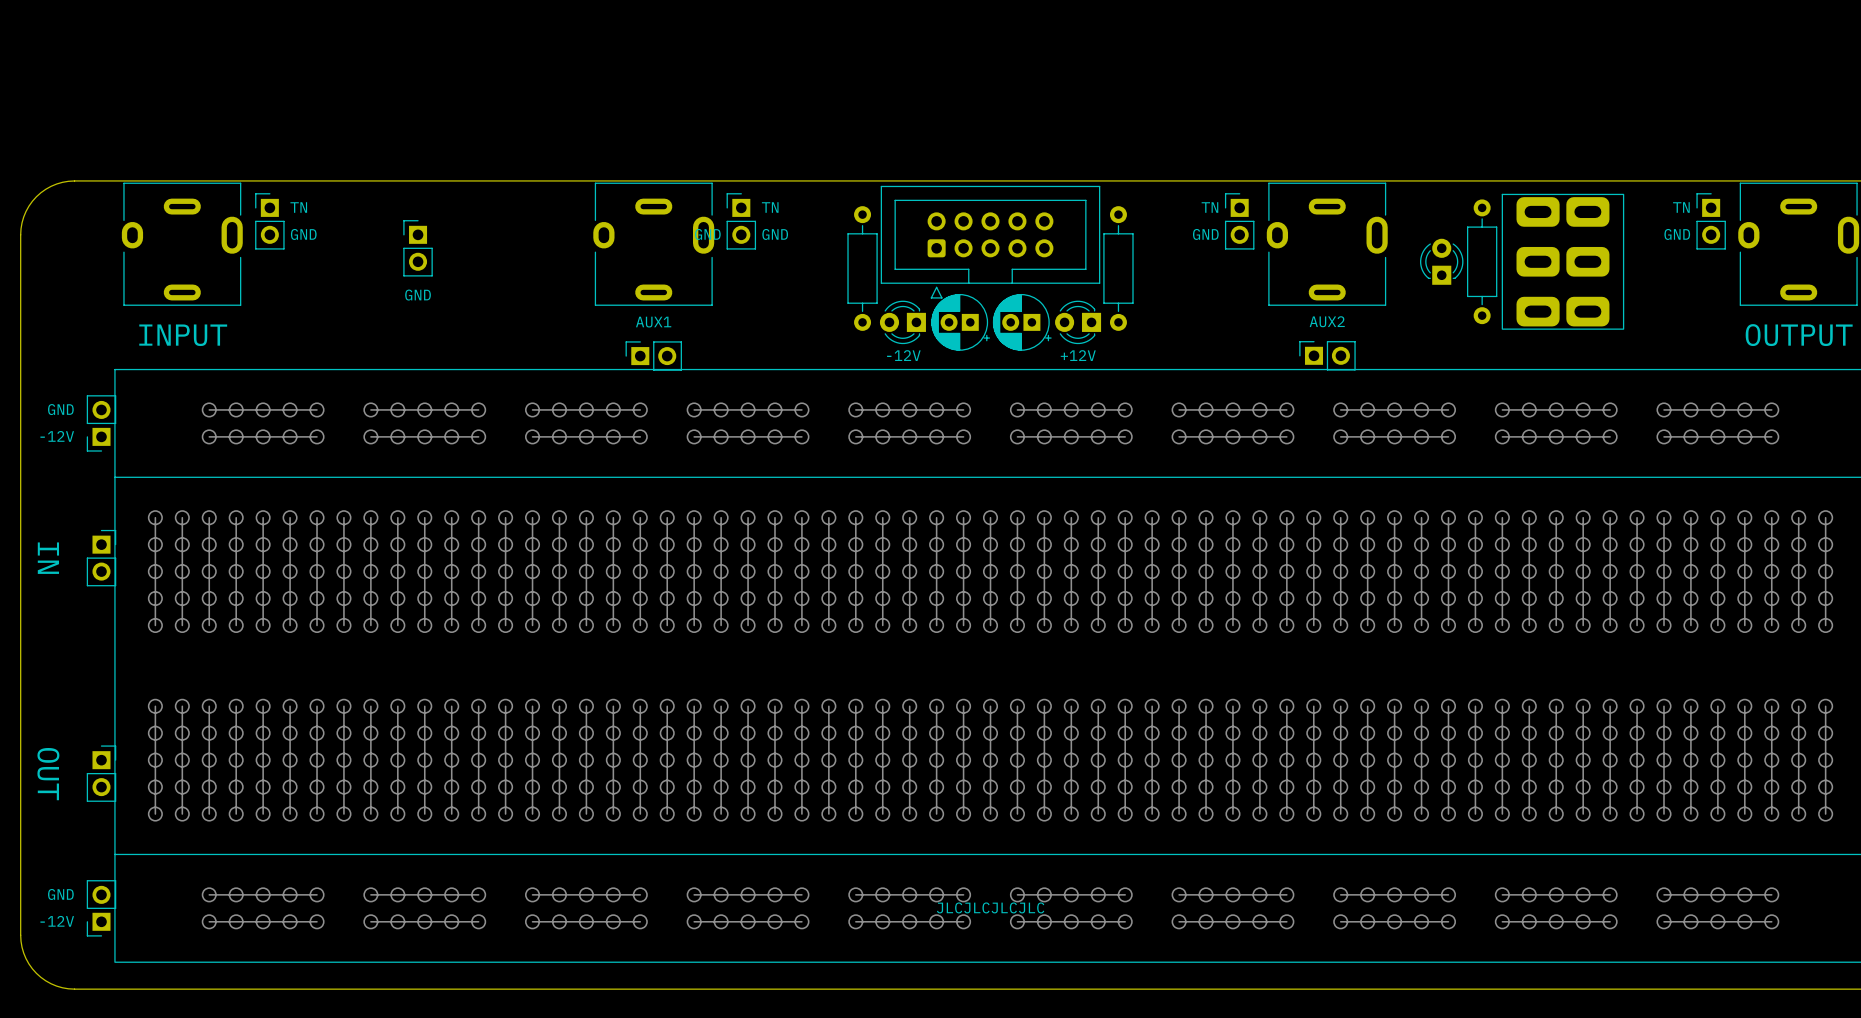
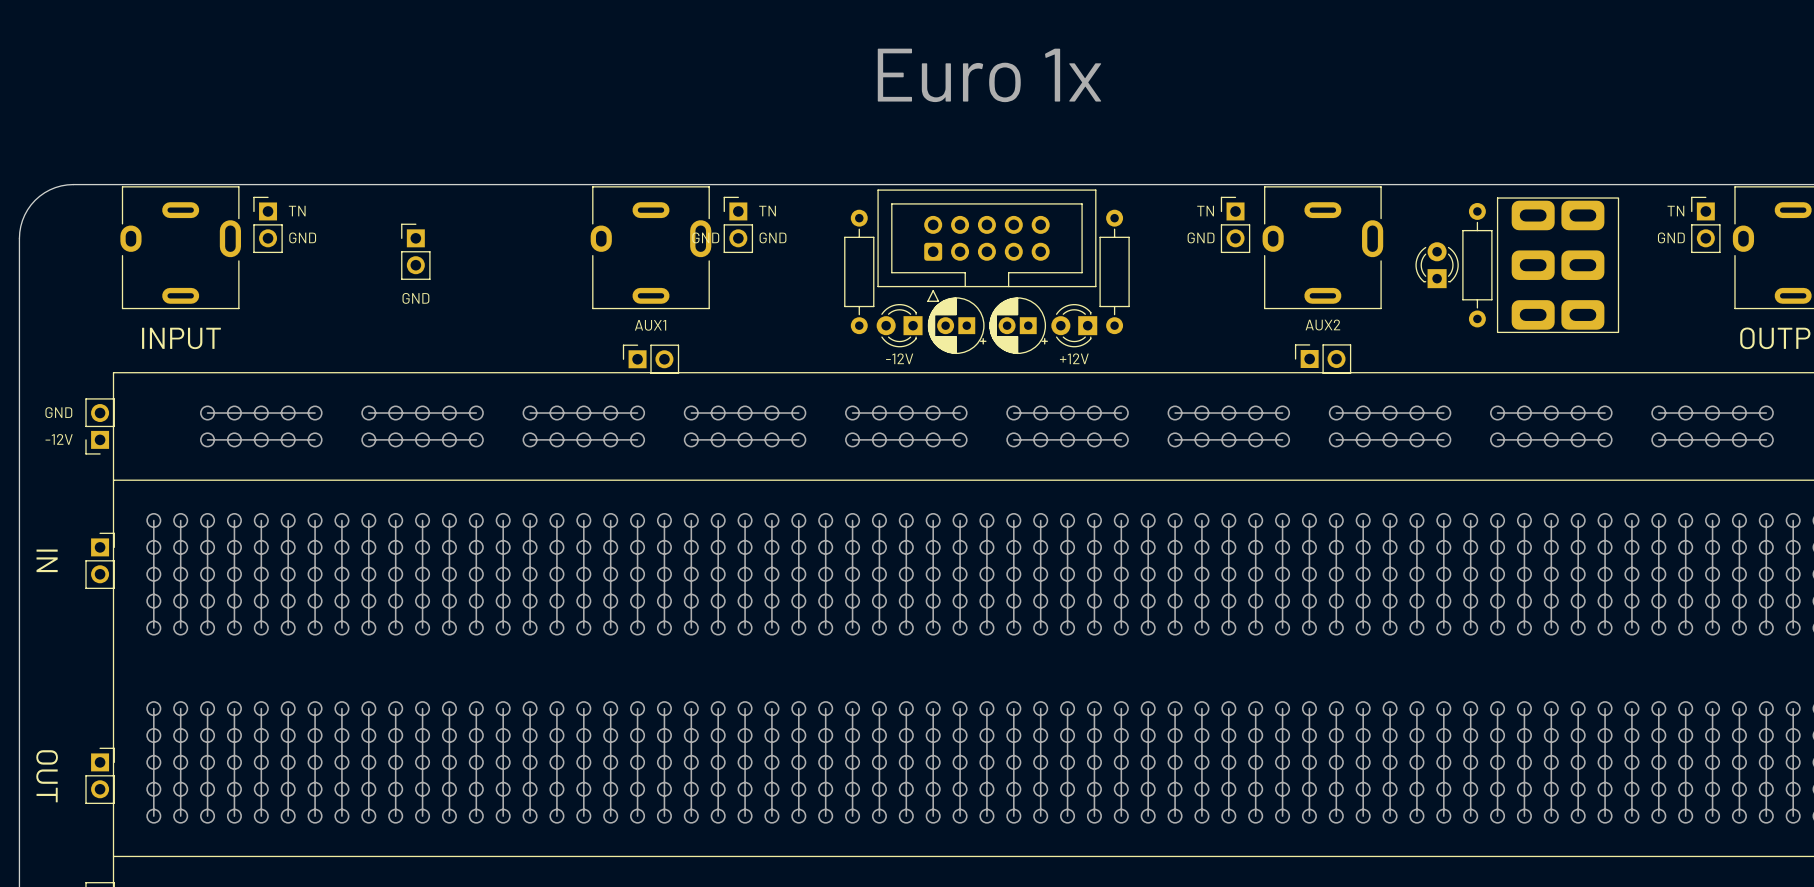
text: none -> Euro 1x (989, 75)

